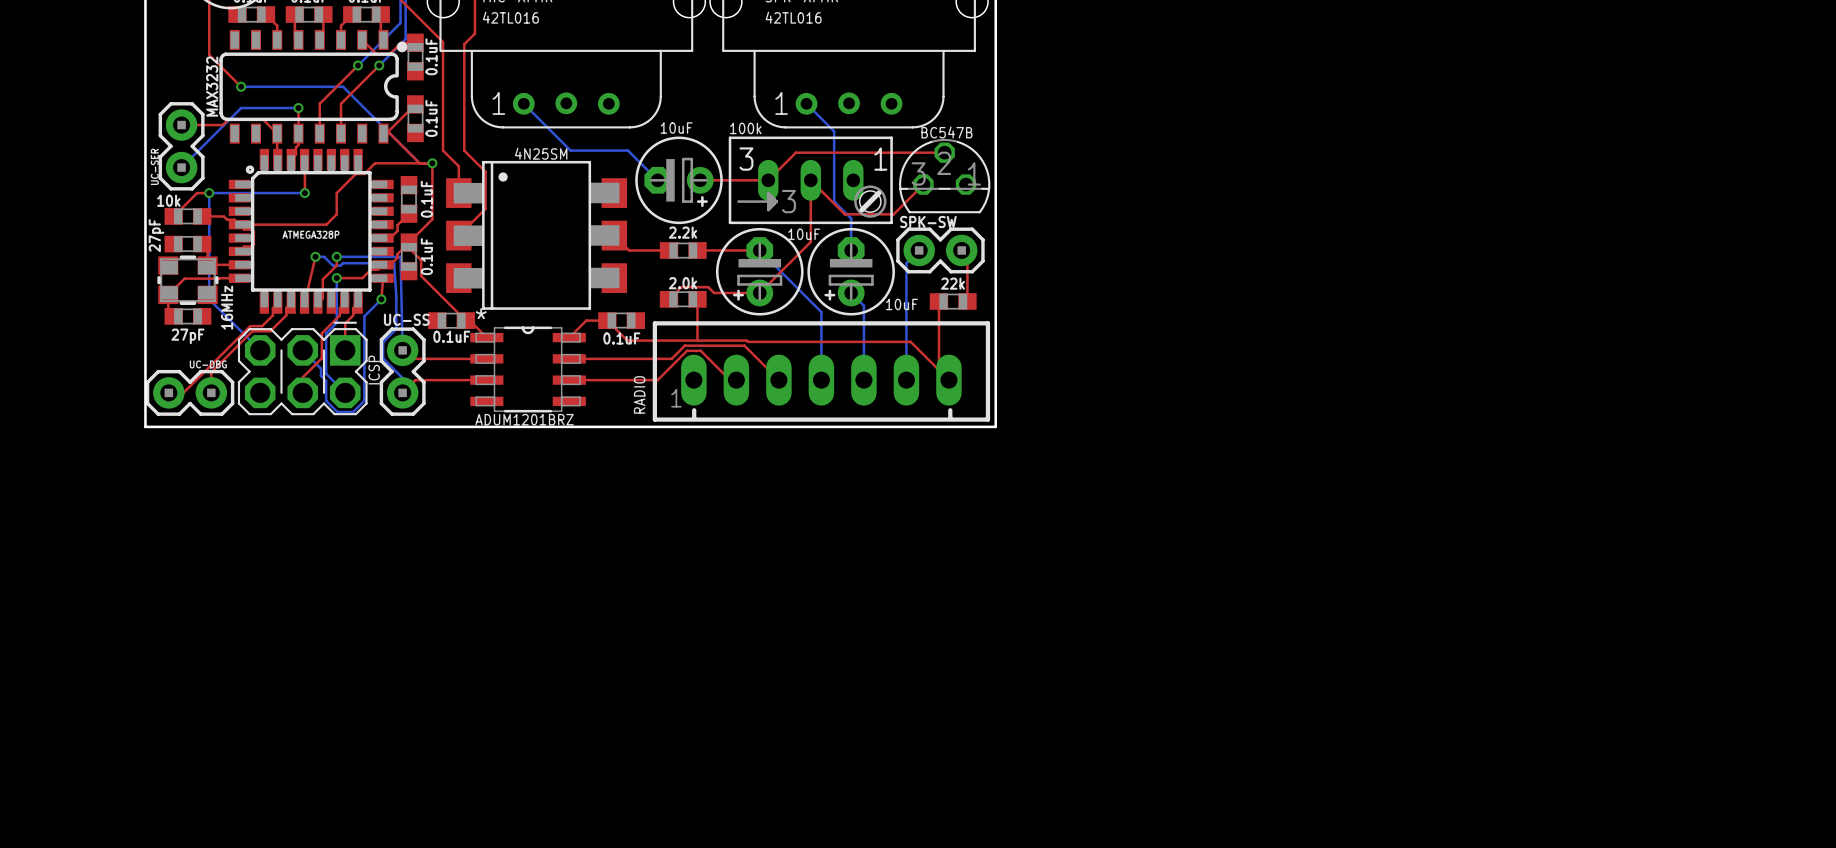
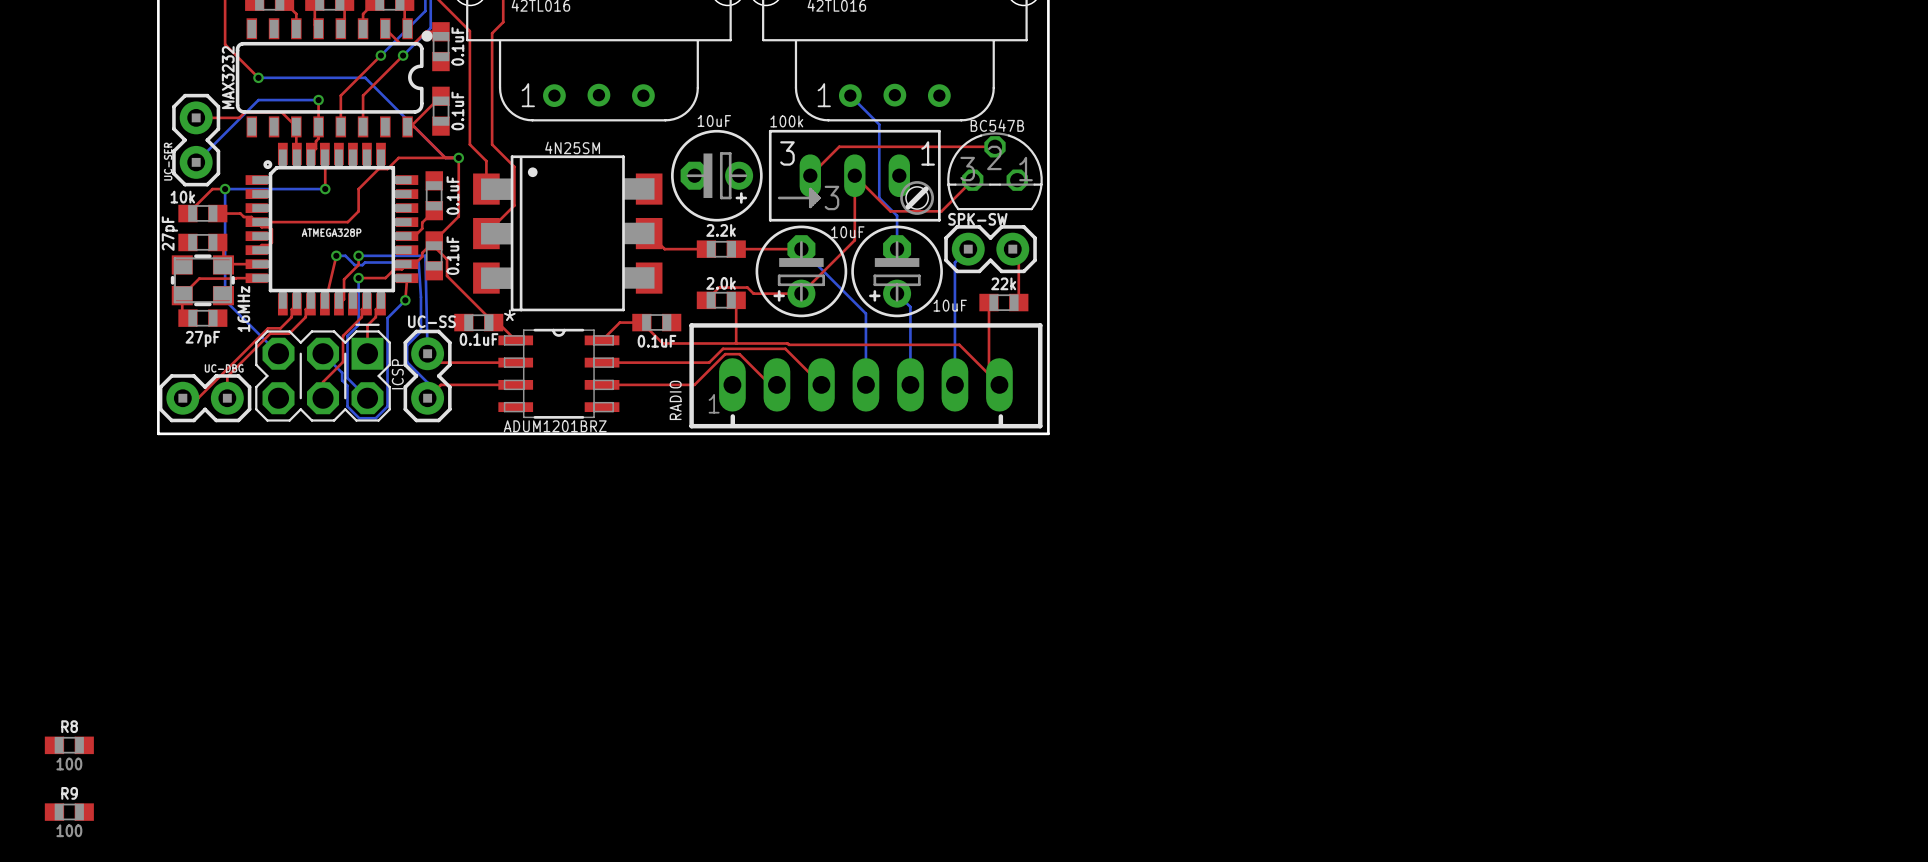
bottom track: (523, 103) (570, 150) (627, 150) (657, 180) -> none
top track: (700, 180) (768, 180) -> none
R8: none -> 100 (69, 745)
R9: none -> 100 (69, 812)

